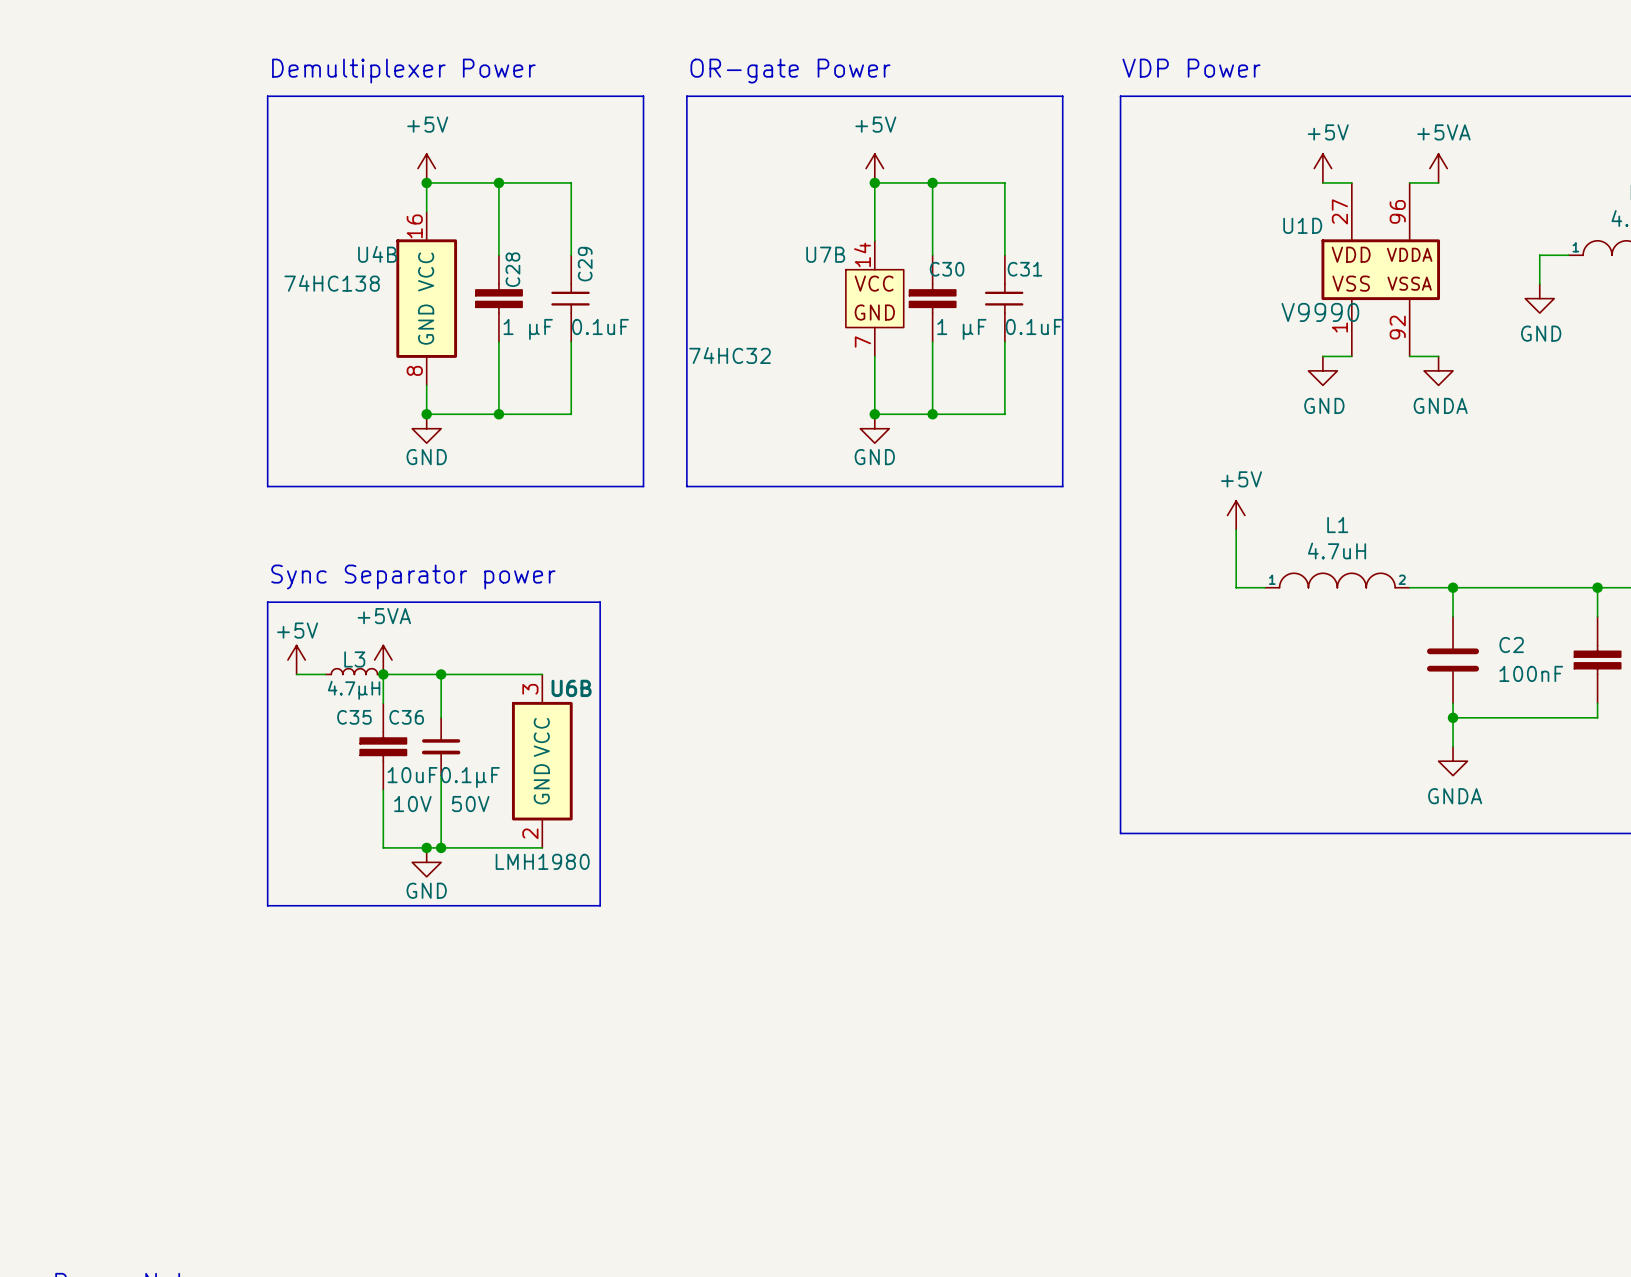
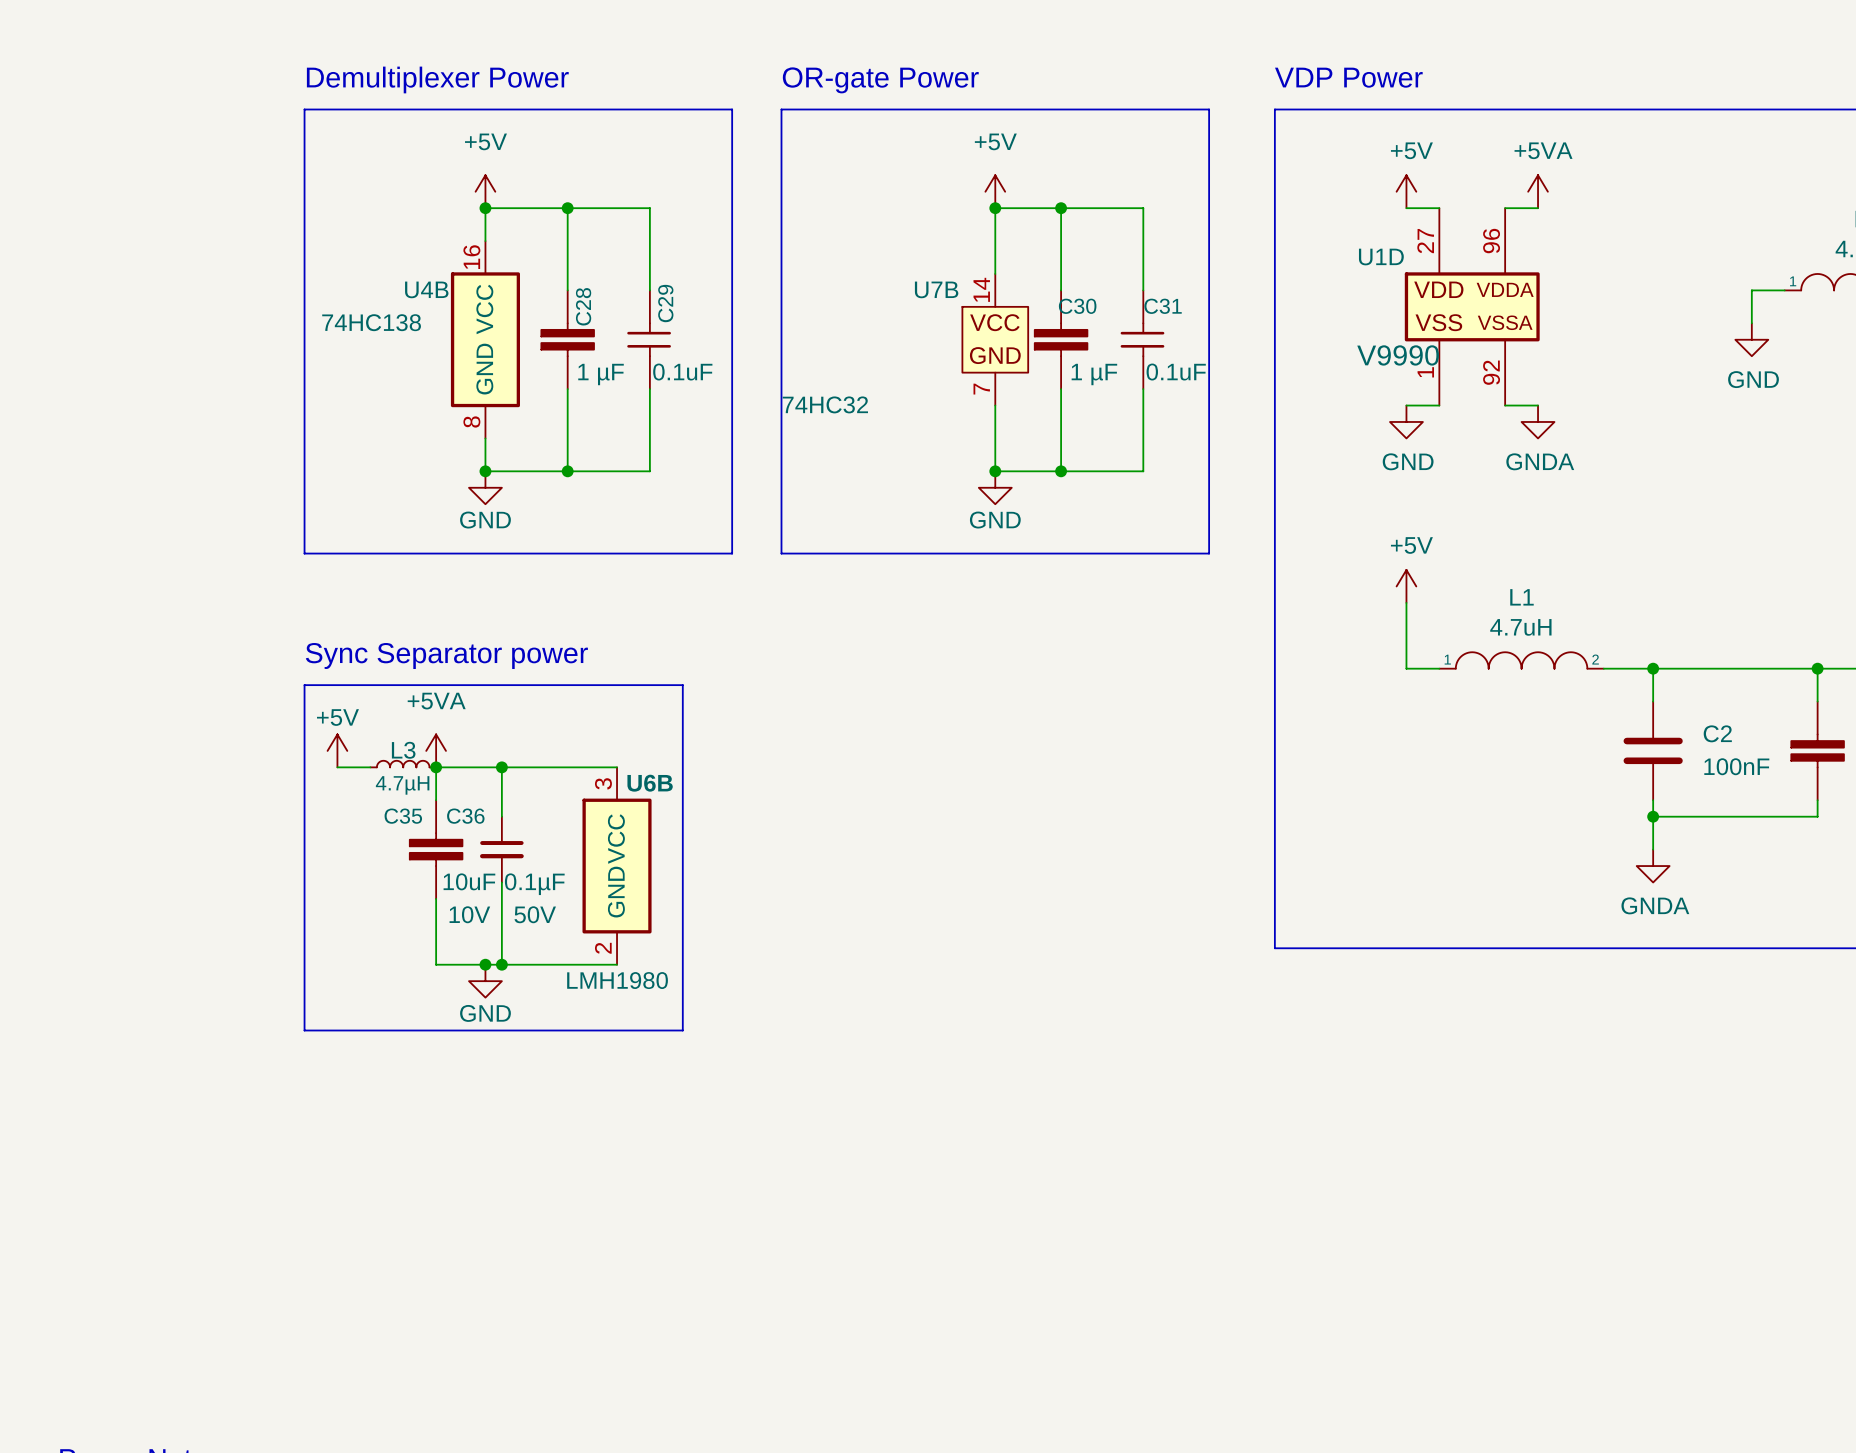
power symbol position: +5V (1322, 168) -> +5V (1406, 191)
power symbol position: +5VA (1438, 168) -> +5VA (1538, 191)
wire: (1409, 182) (1438, 182) -> (1406, 208) (1439, 208)
U1D position: (1380, 269) -> (1472, 306)
wire: (1409, 356) (1438, 356) -> (1406, 405) (1439, 405)
power symbol position: GND (1322, 370) -> GND (1406, 421)
power symbol position: GNDA (1438, 370) -> GNDA (1538, 421)

